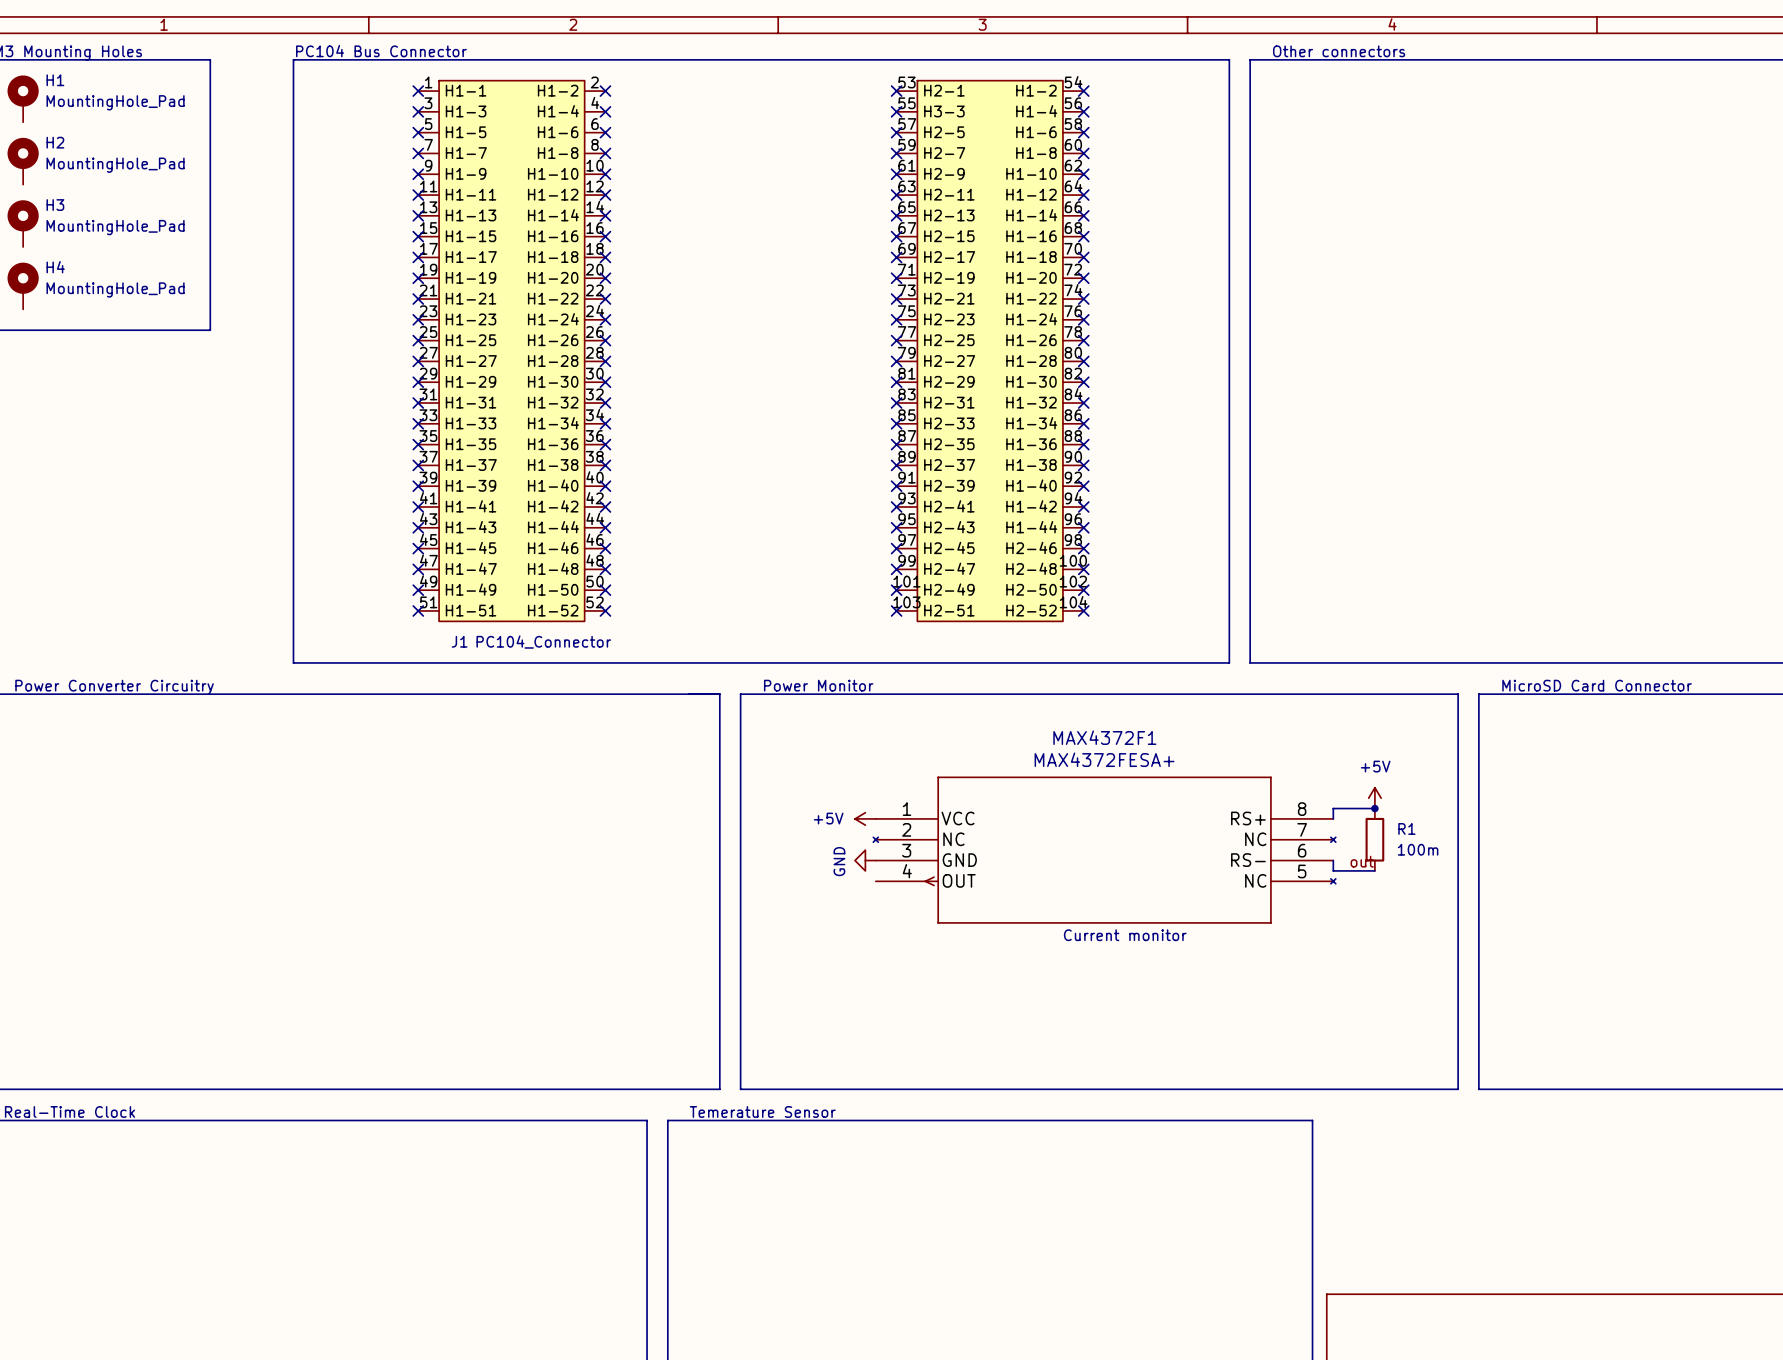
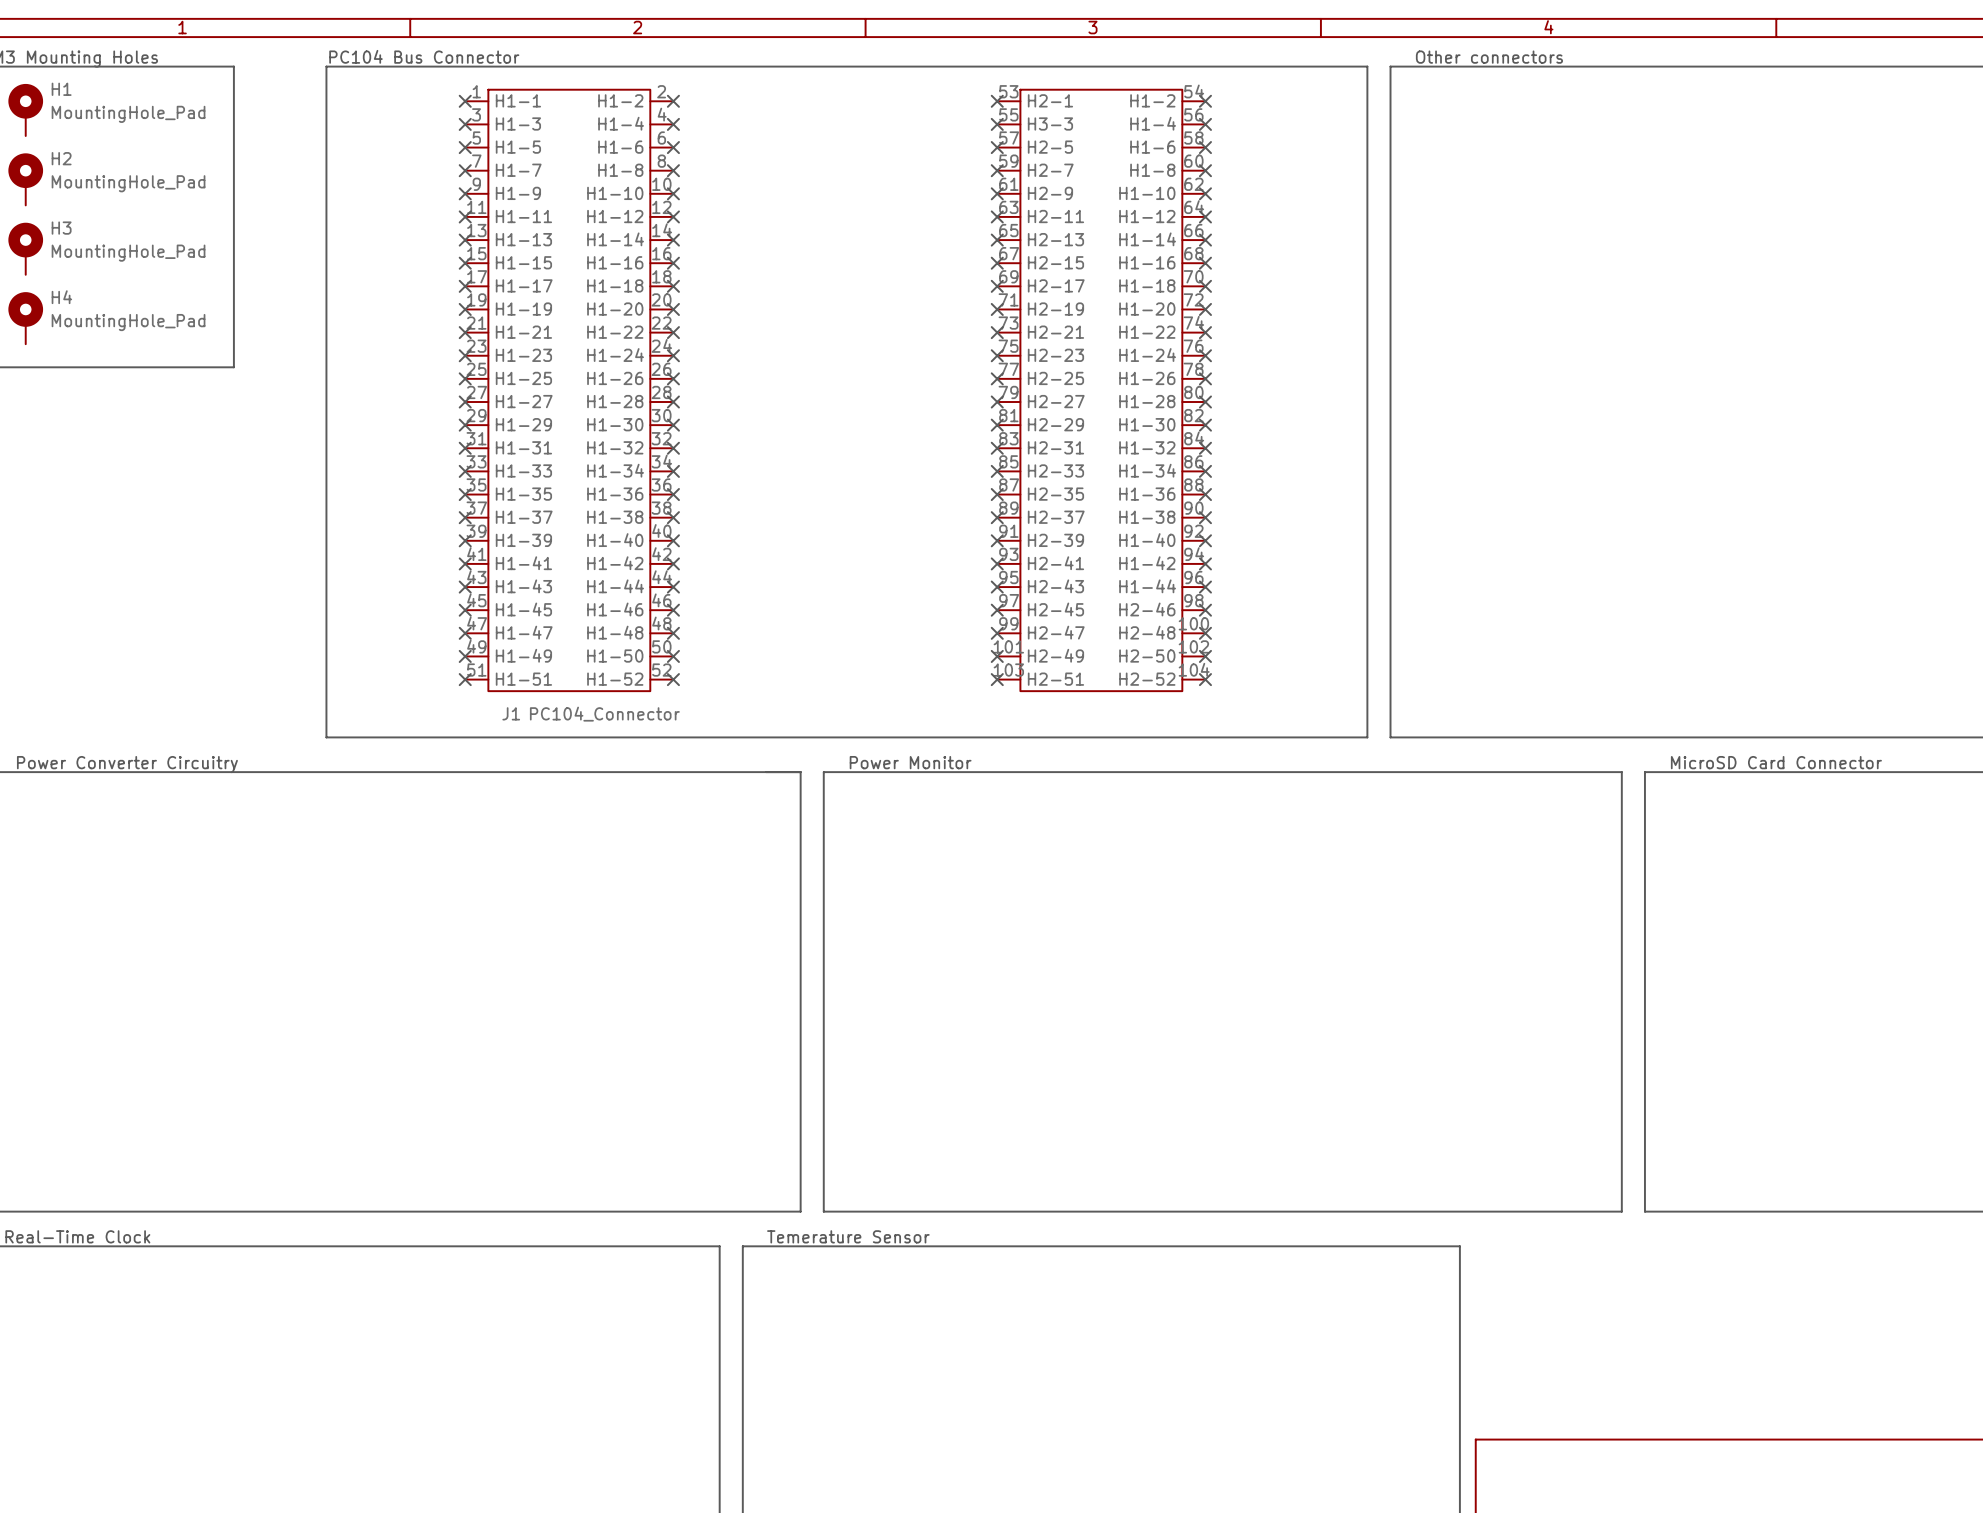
power symbol: +5V (1374, 798) -> none
wire: (1374, 808) (1333, 808) (1333, 818) -> none
junction: (1374, 808) -> none
power symbol: +5V (865, 818) -> none
R1: 100m (1374, 839) -> none
MAX4372F1: MAX4372FESA+ (1104, 850) -> none
power symbol: GND (865, 860) -> none
wire: (1333, 860) (1333, 870) (1374, 870) -> none
label: out (1362, 861) -> none
text: Current monitor (1125, 935) -> none

